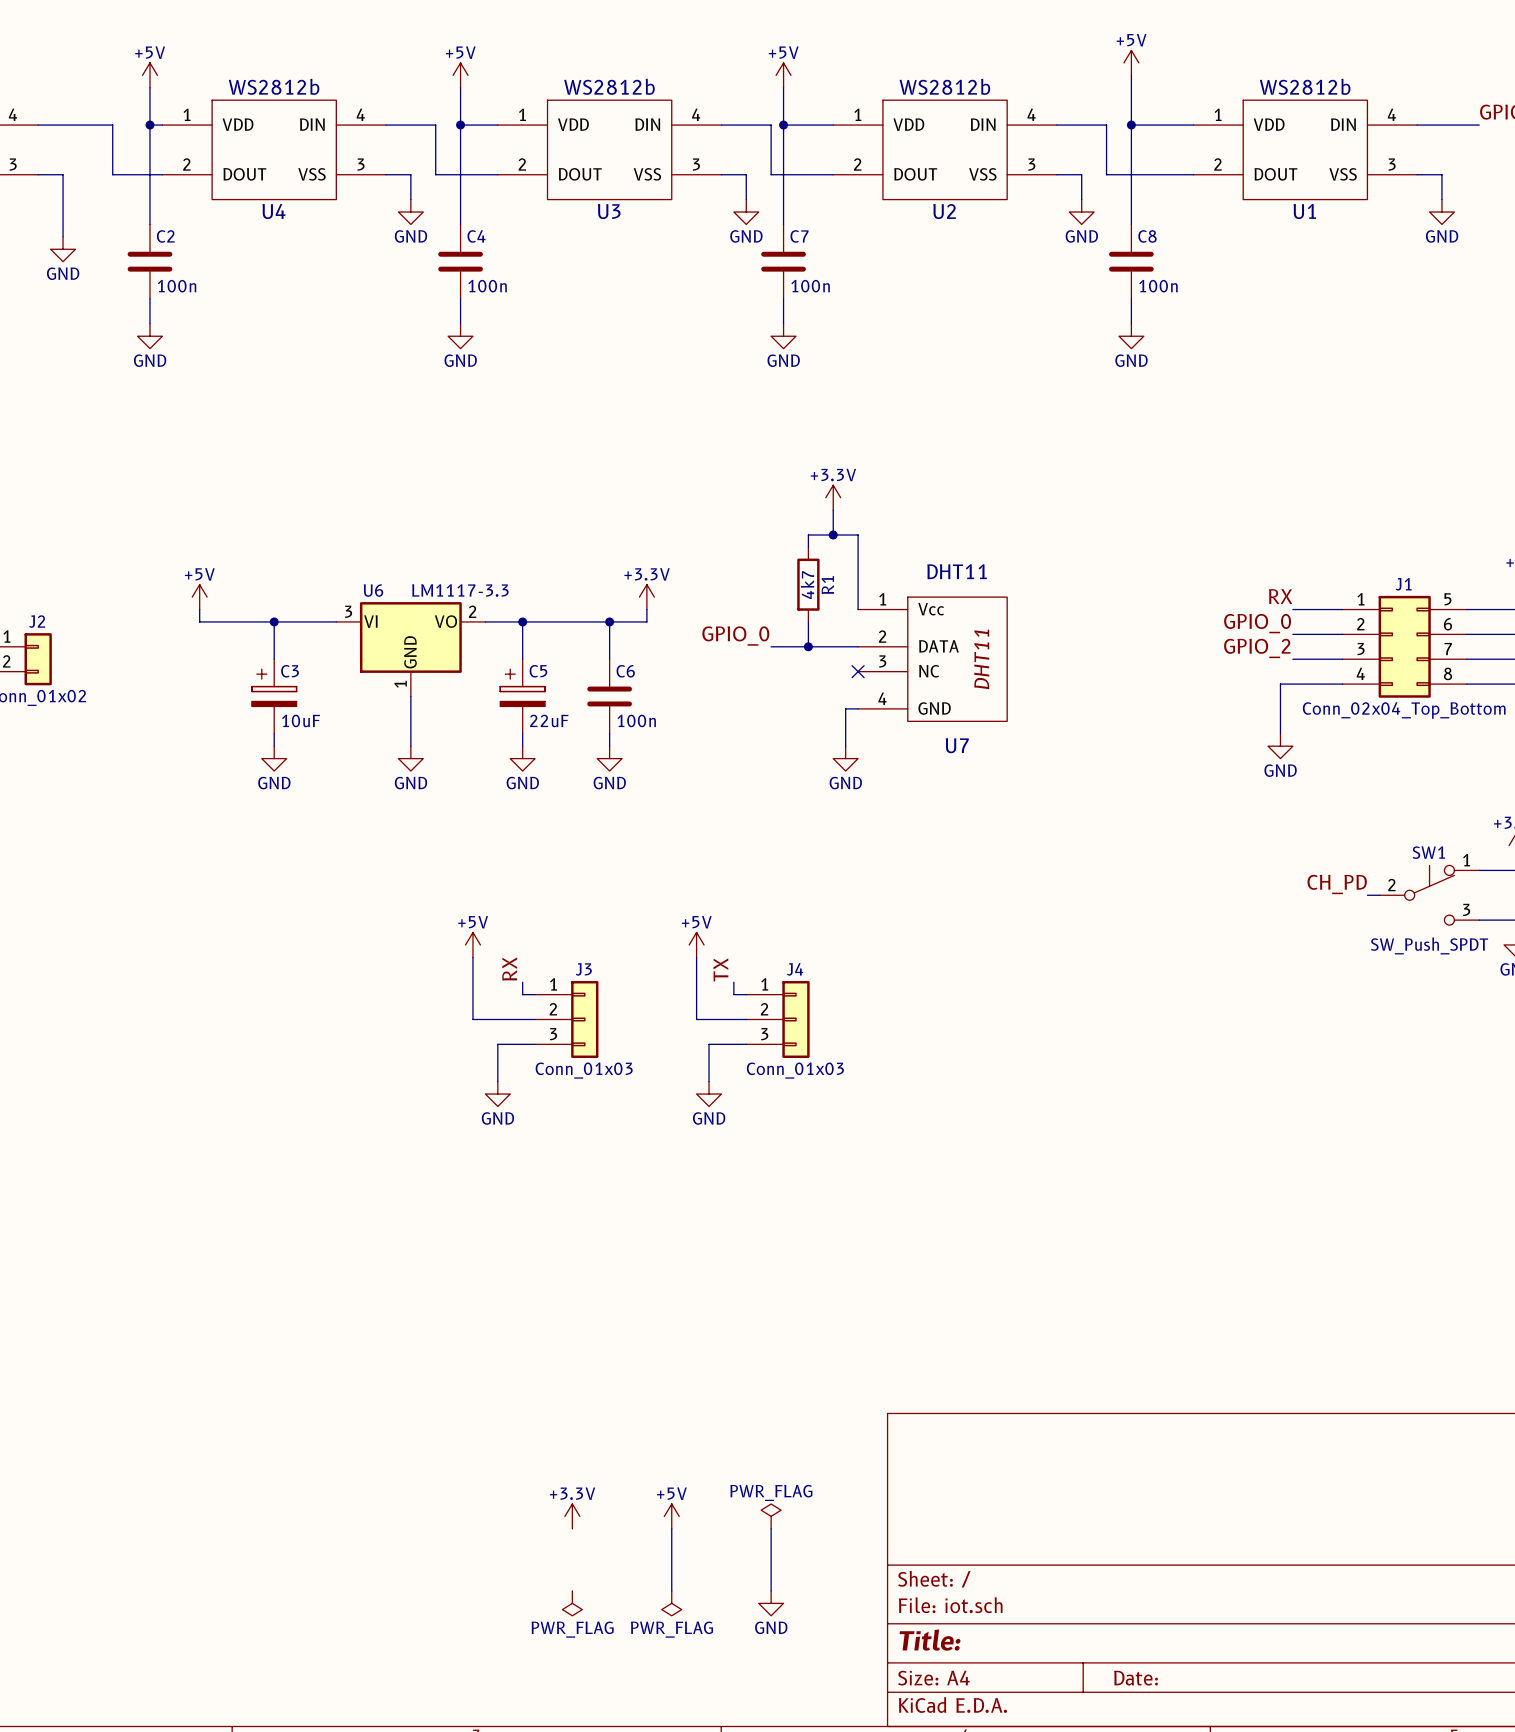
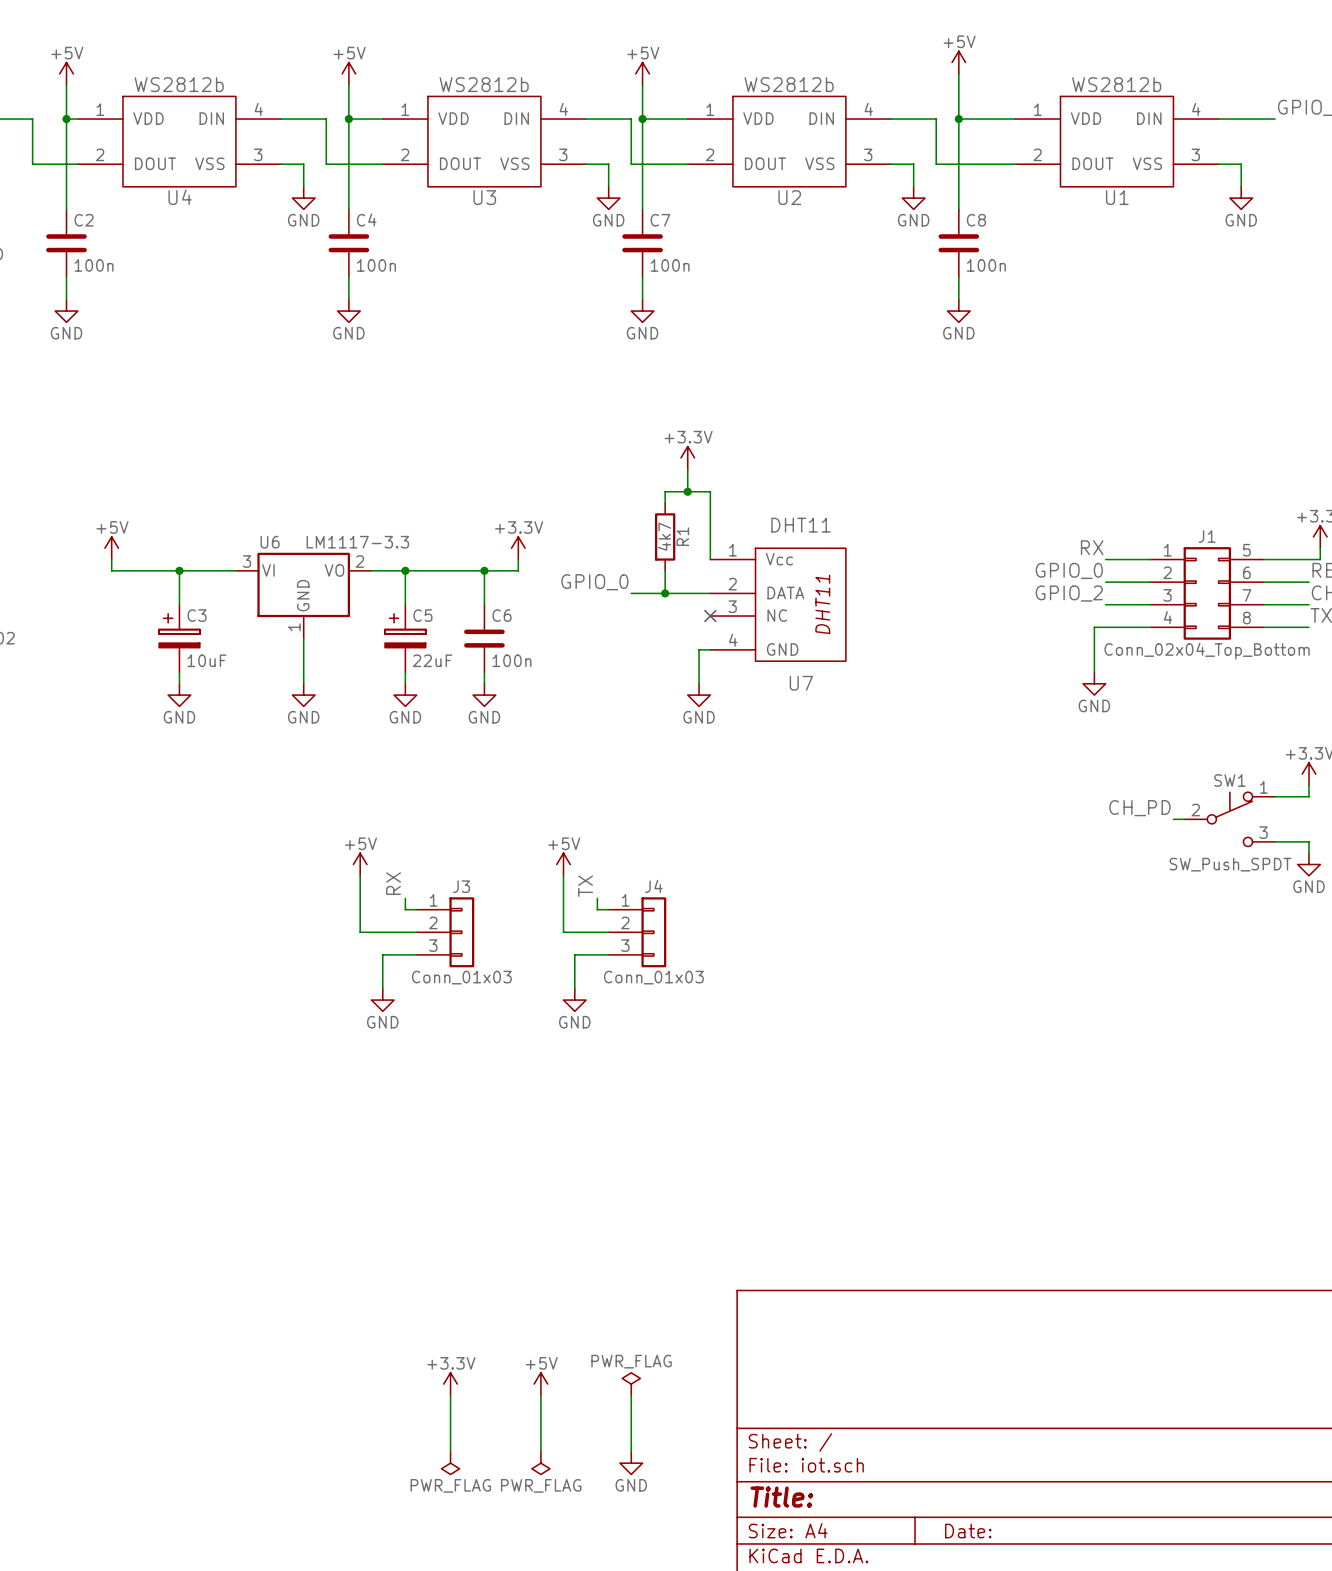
wire: none -> (450, 1395) (450, 1451)

